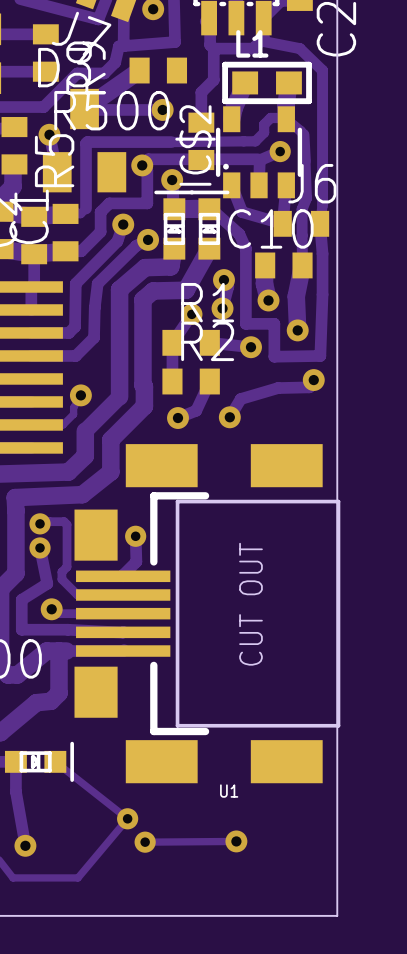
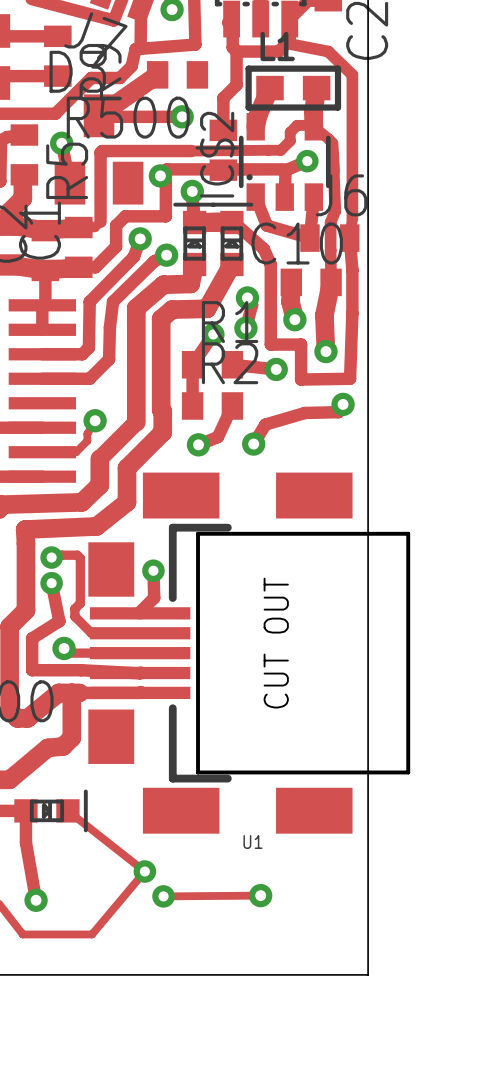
U1 footprint: [74, 444, 341, 784] -> [88, 472, 411, 834]

